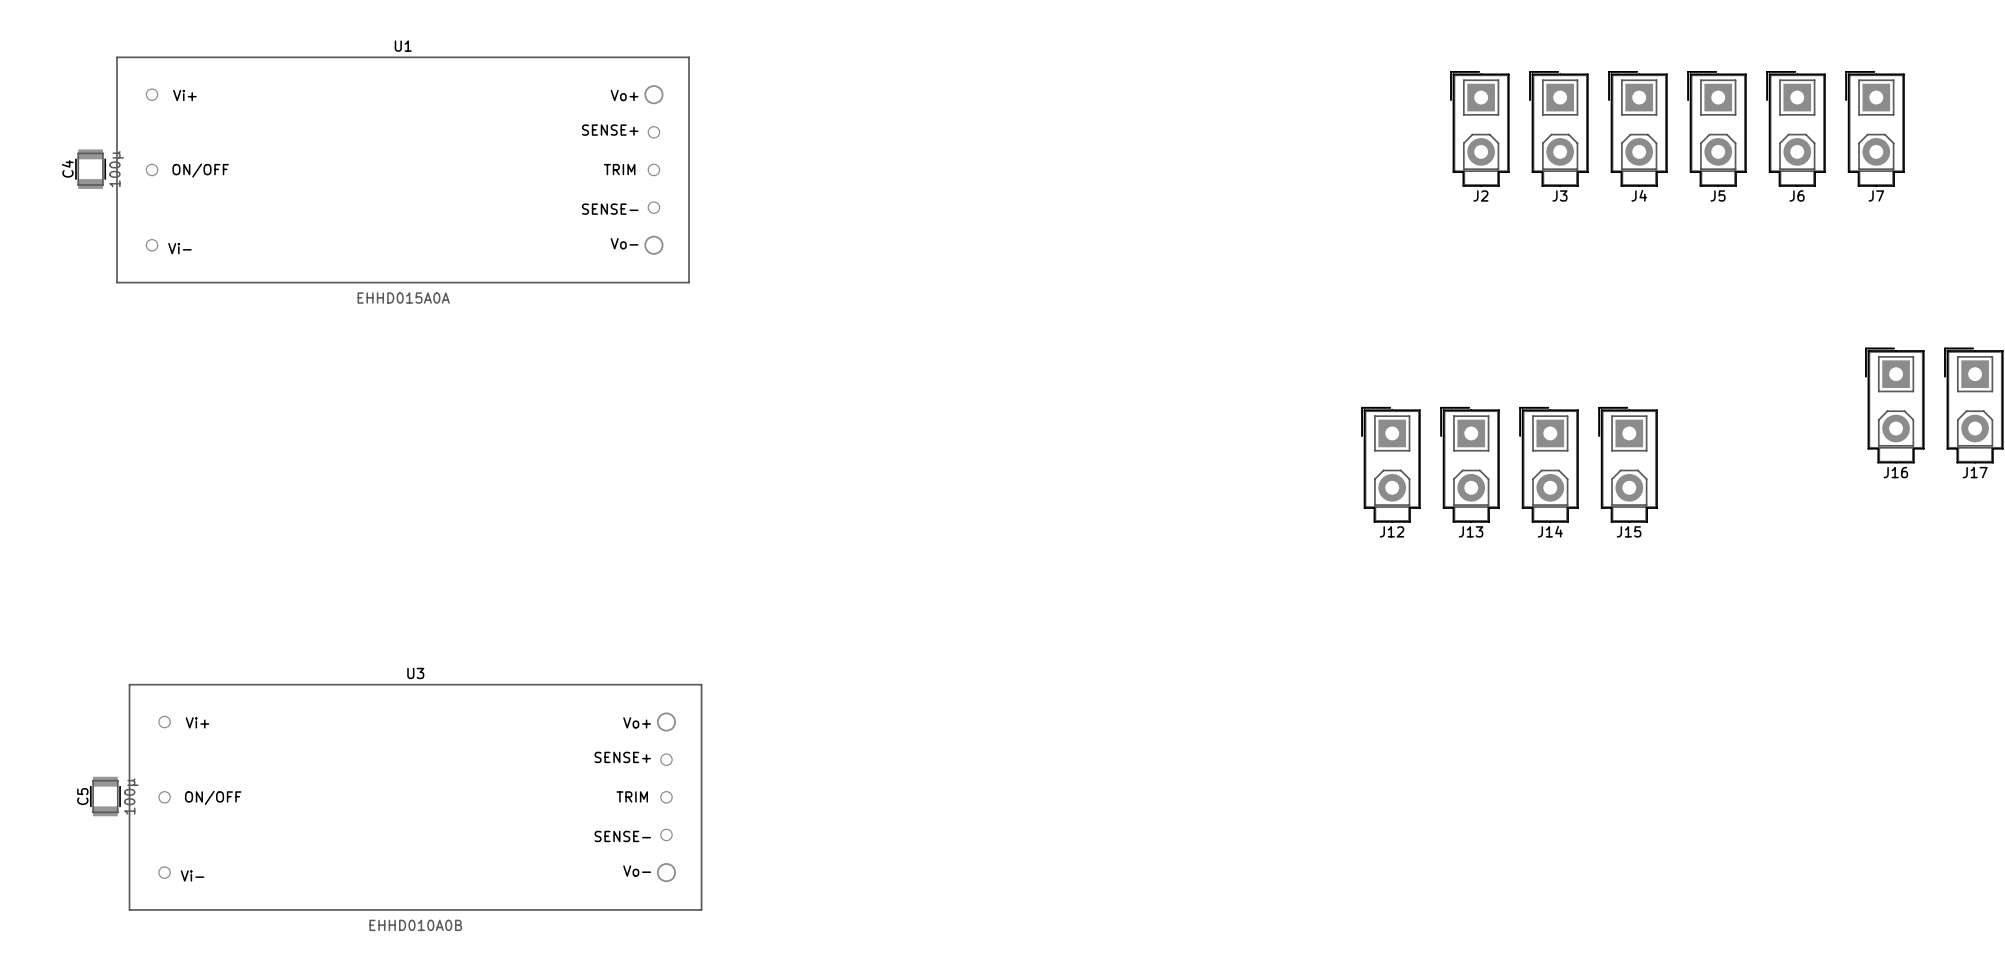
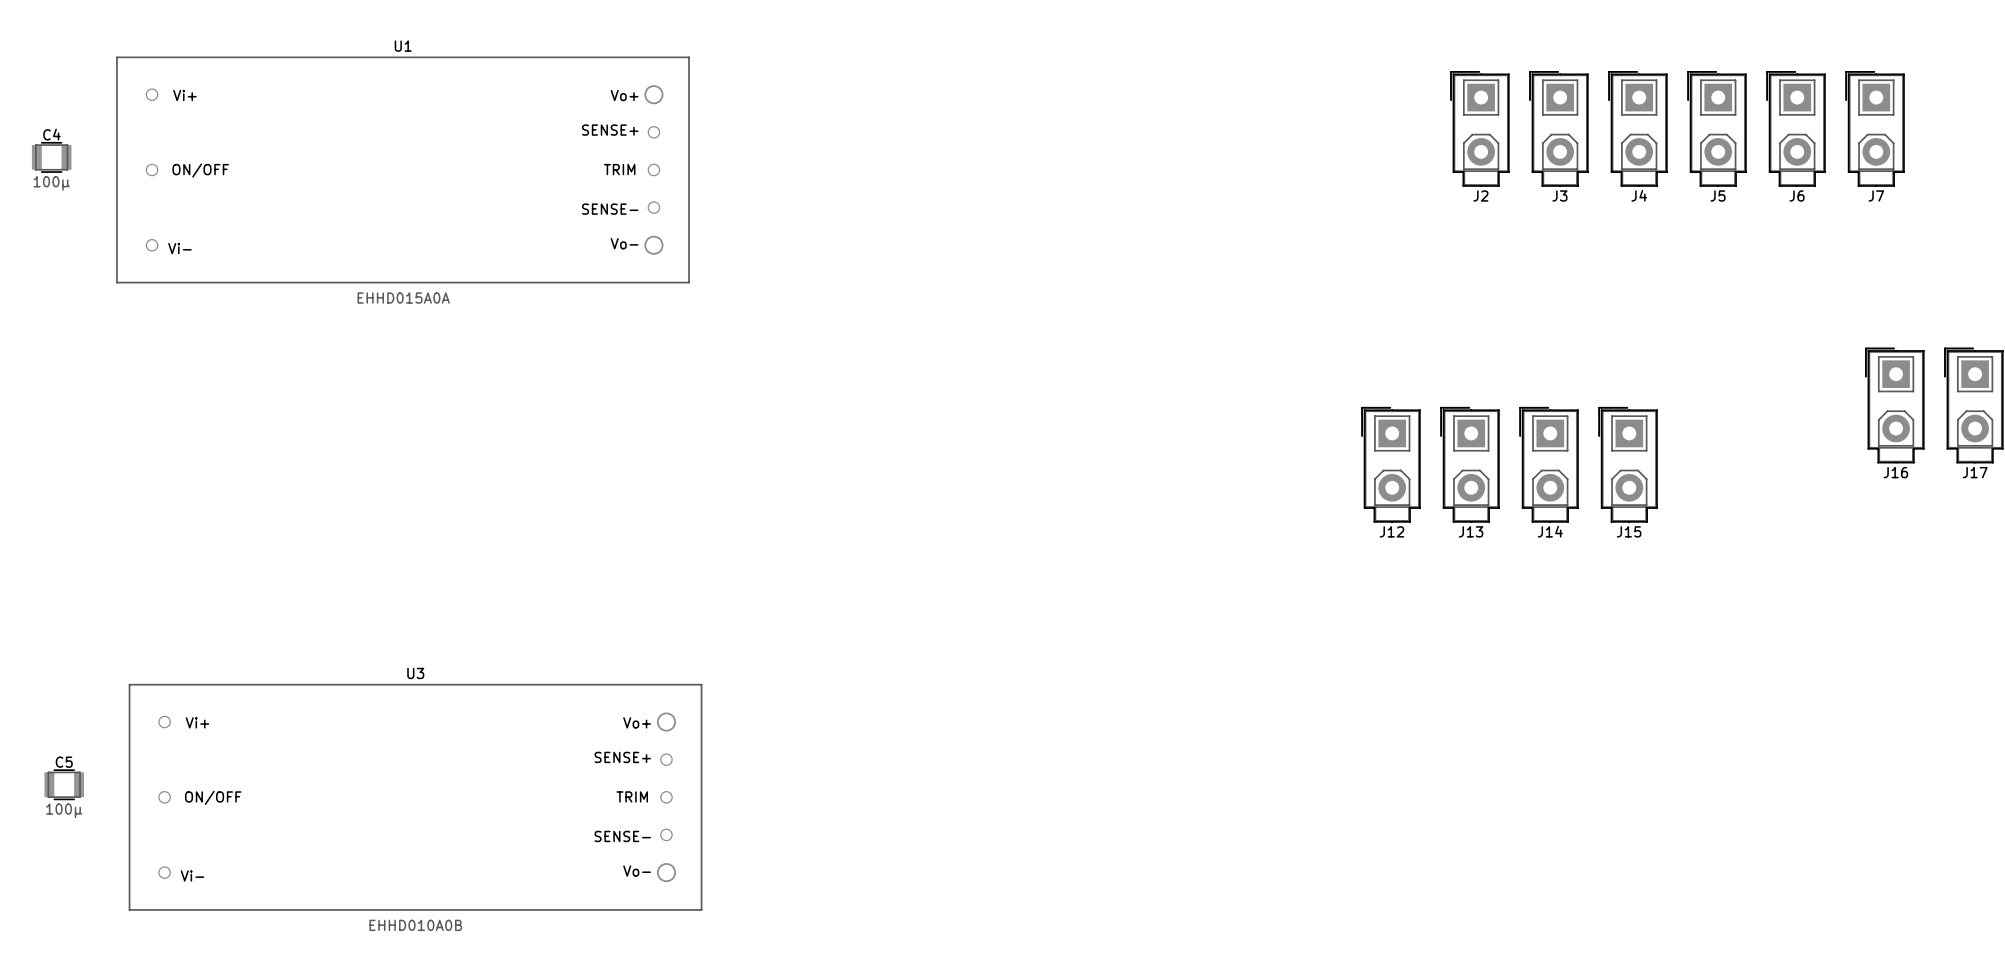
C4 rotation: 0° (90, 169) -> 90° clockwise (51, 157)
C4 position: (90, 169) -> (51, 157)
C5 rotation: 0° (105, 796) -> 90° clockwise (64, 784)
C5 position: (105, 796) -> (64, 784)

